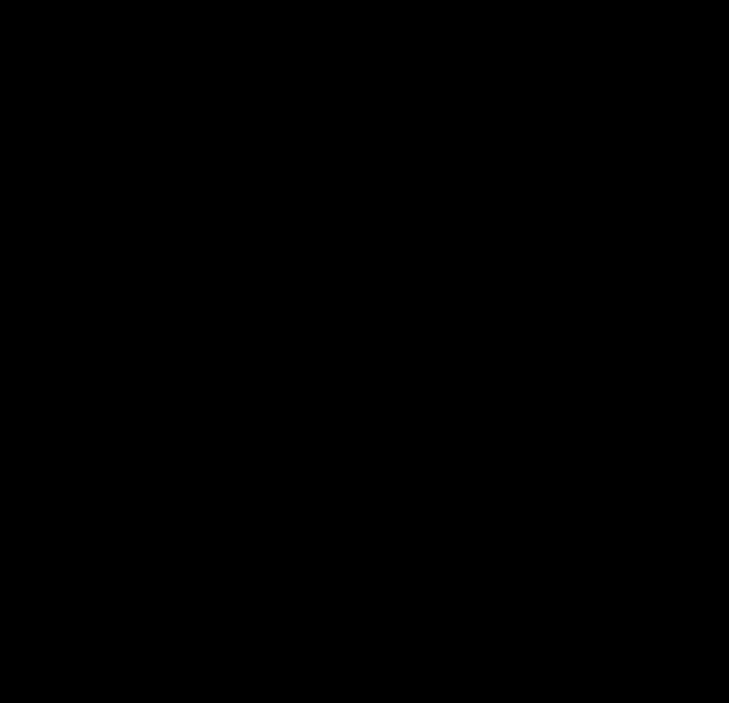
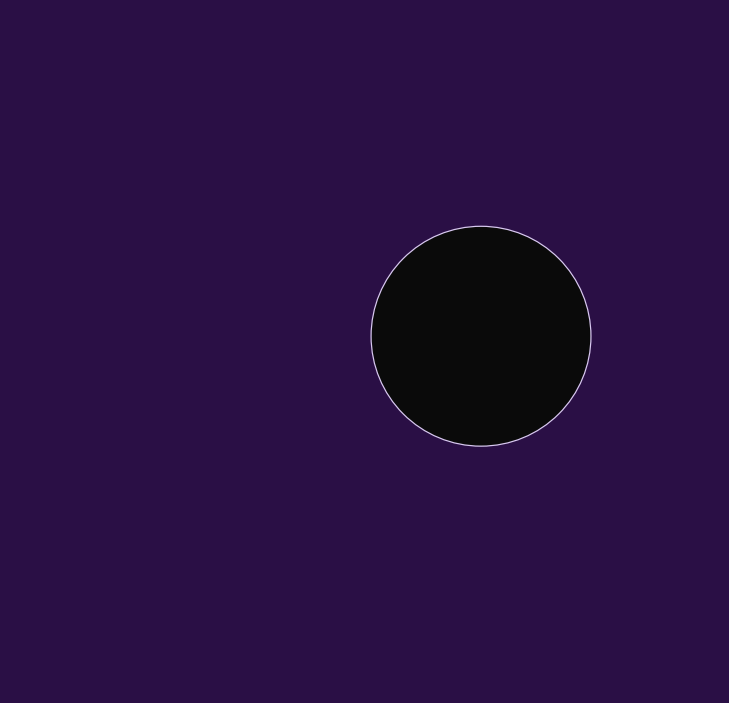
part: none -> (481, 336)

